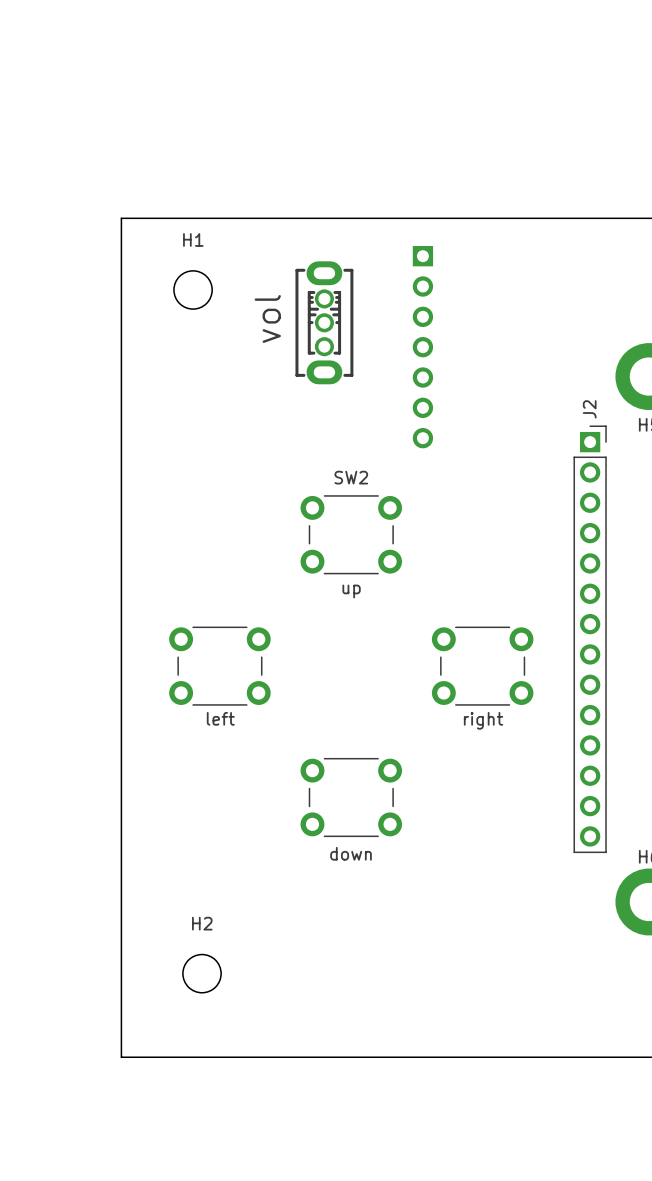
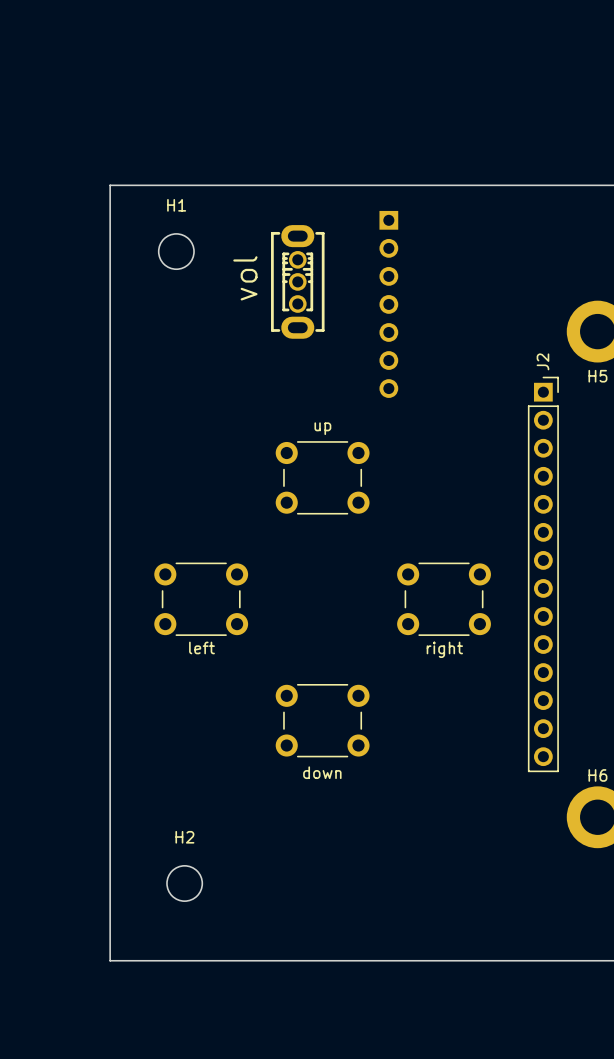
SW2 name: SW2 (351, 477) -> up (322, 428)
SW2 value: up (351, 591) -> none

